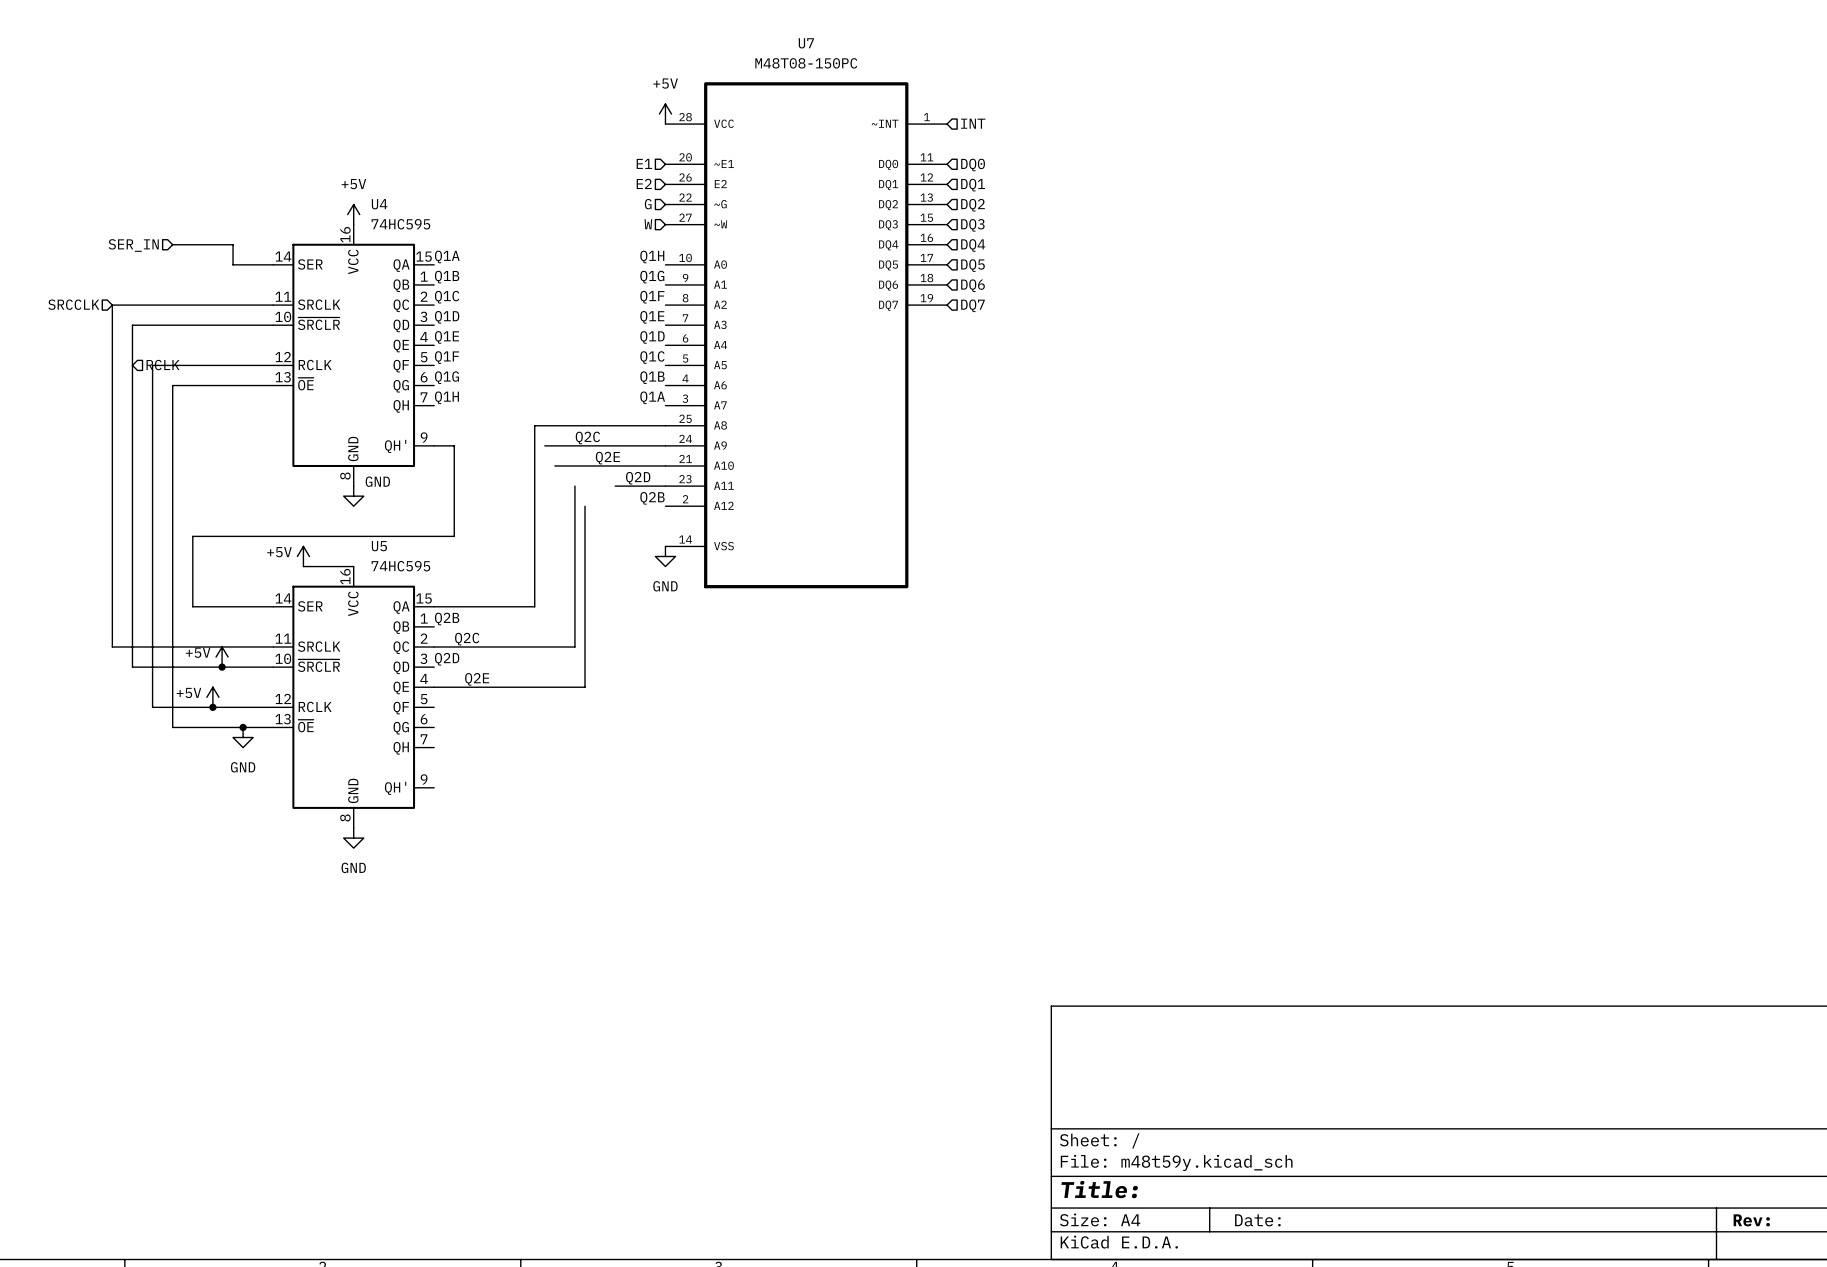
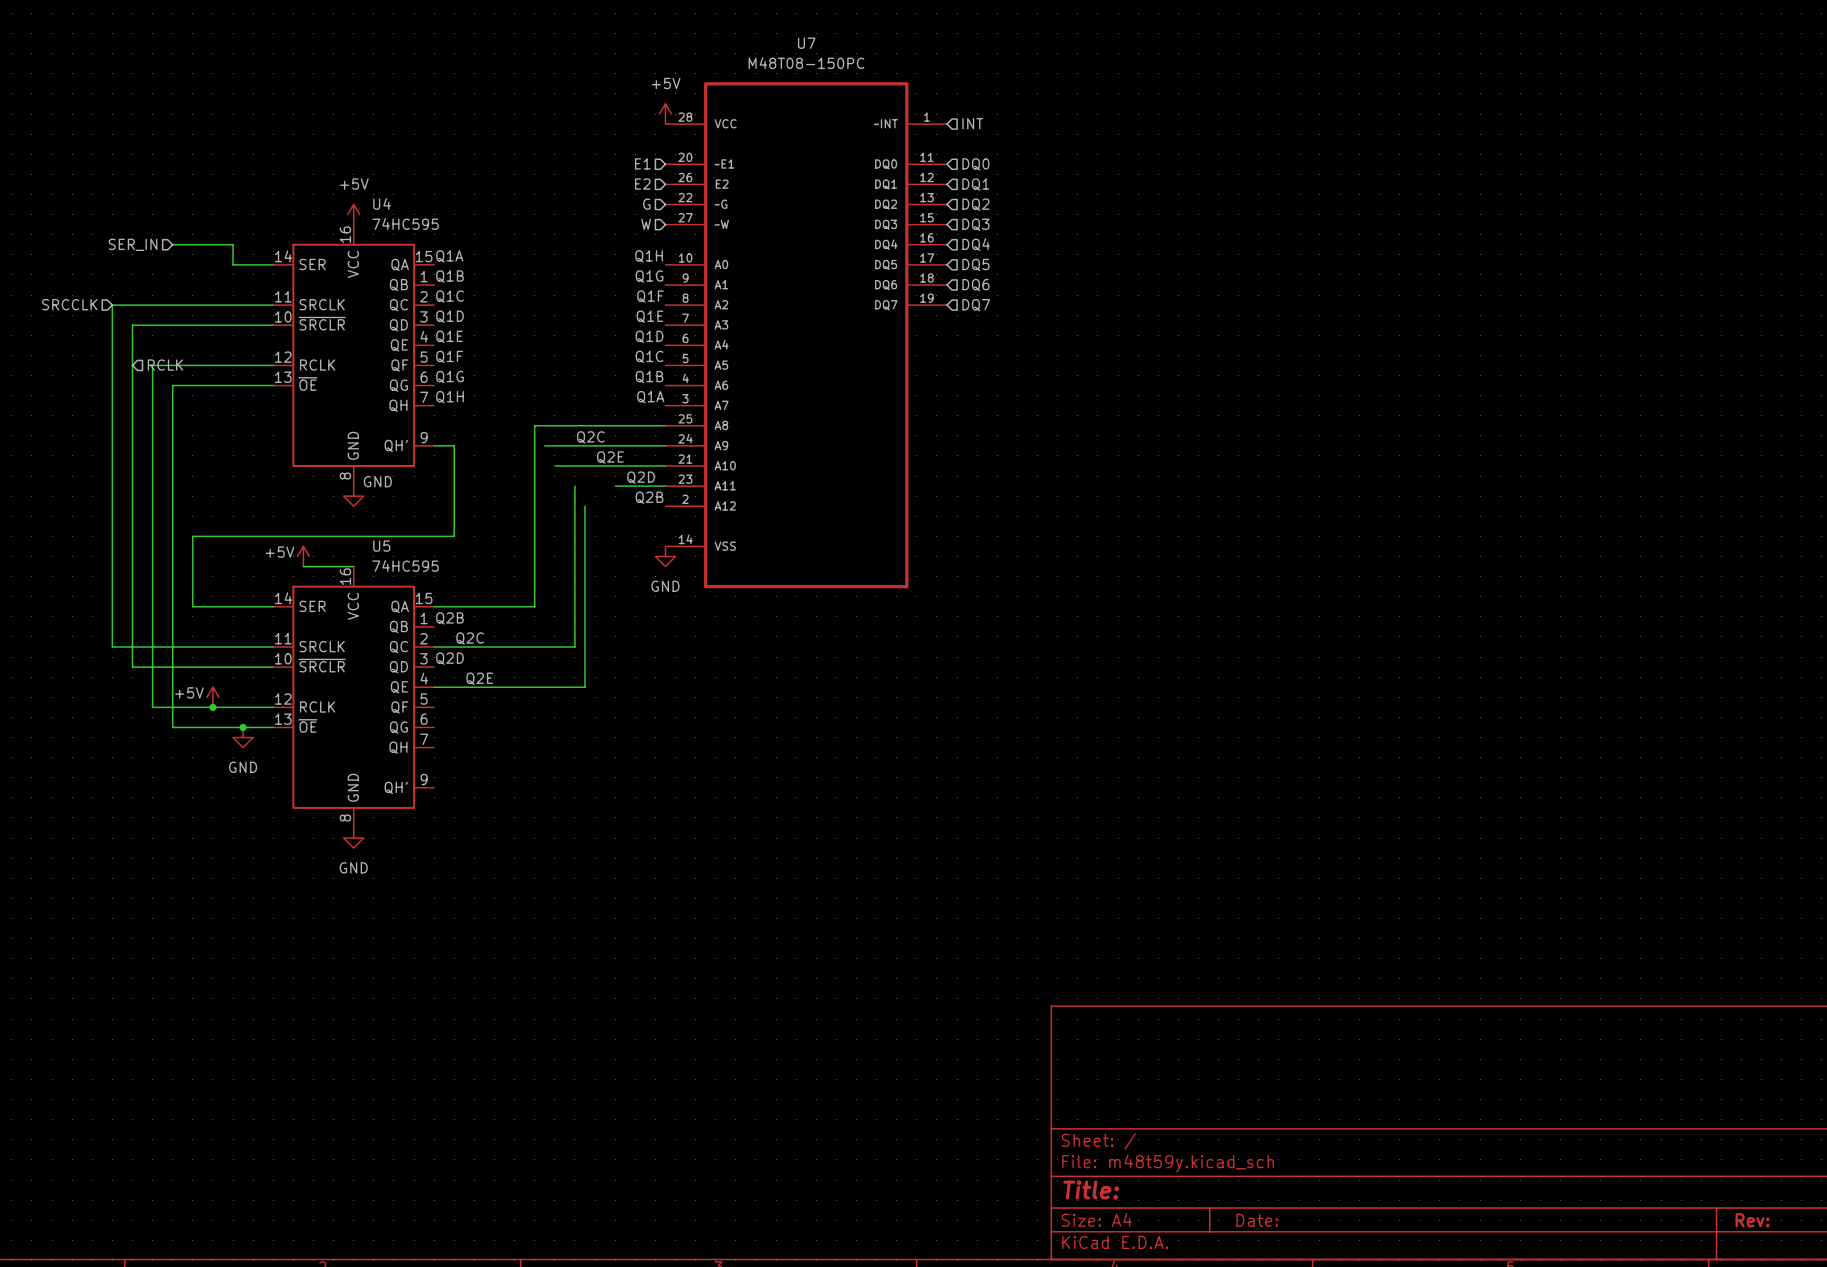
power symbol: +5V (222, 657) -> none
junction: (222, 667) -> none

